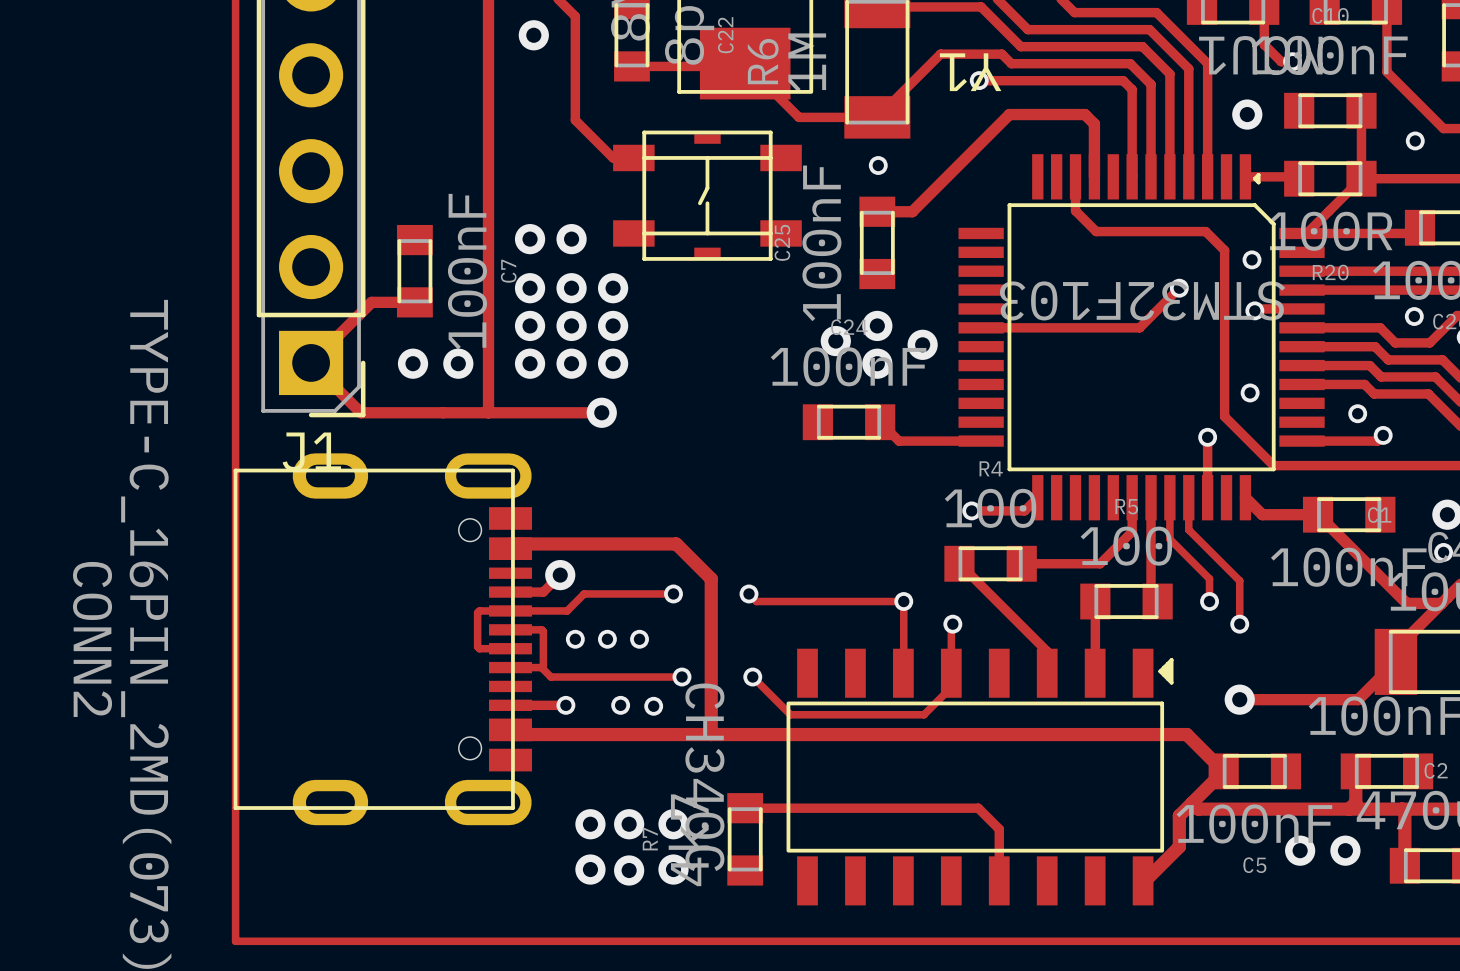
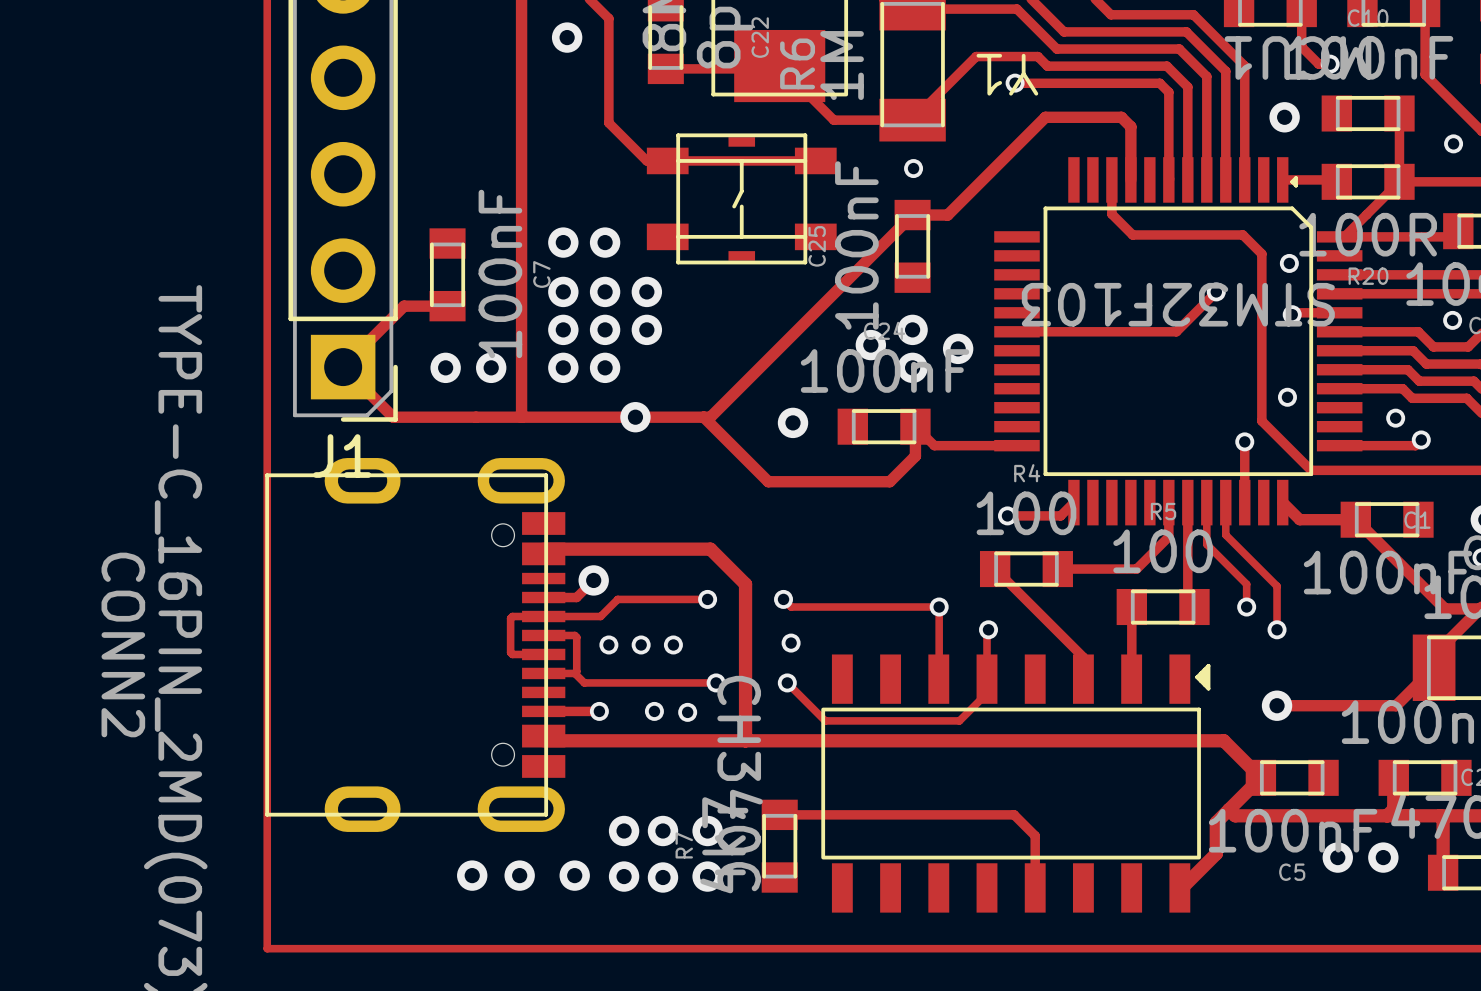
track: none -> (667, 160) (815, 160)
track: none -> (912, 215) (710, 417) (635, 417)
via position: (613, 363) -> (793, 422)
track: none -> (703, 417) (768, 481) (889, 481) (915, 456) (915, 426) (912, 426)
via: none -> (791, 643)
via: none -> (472, 875)
via: none -> (519, 875)
via: none -> (574, 875)

